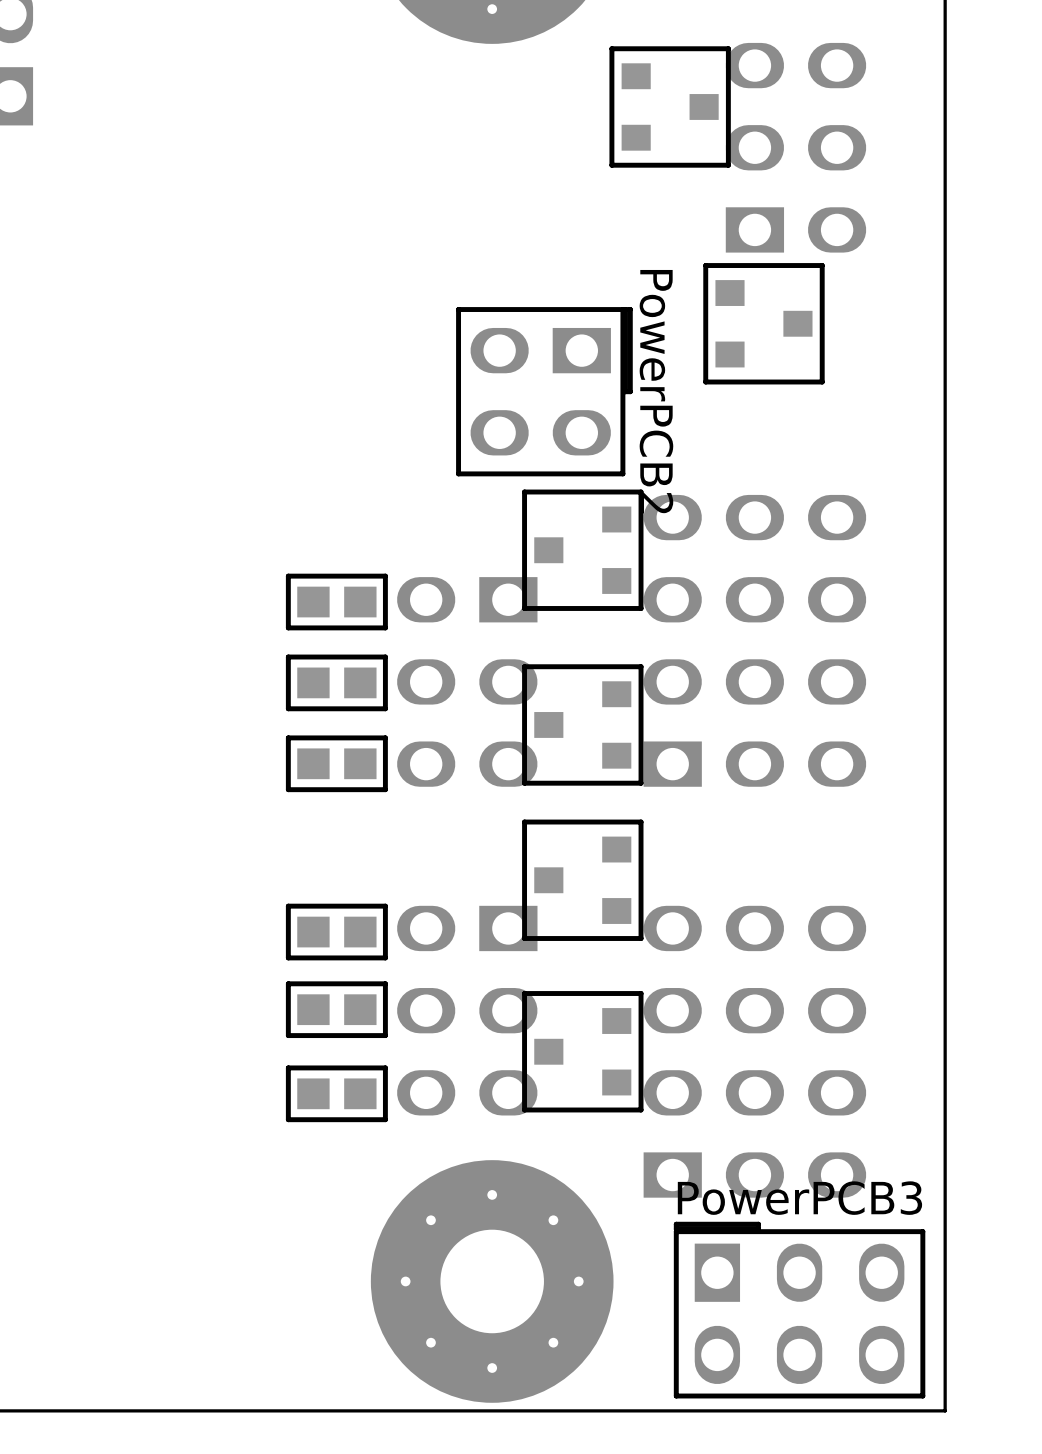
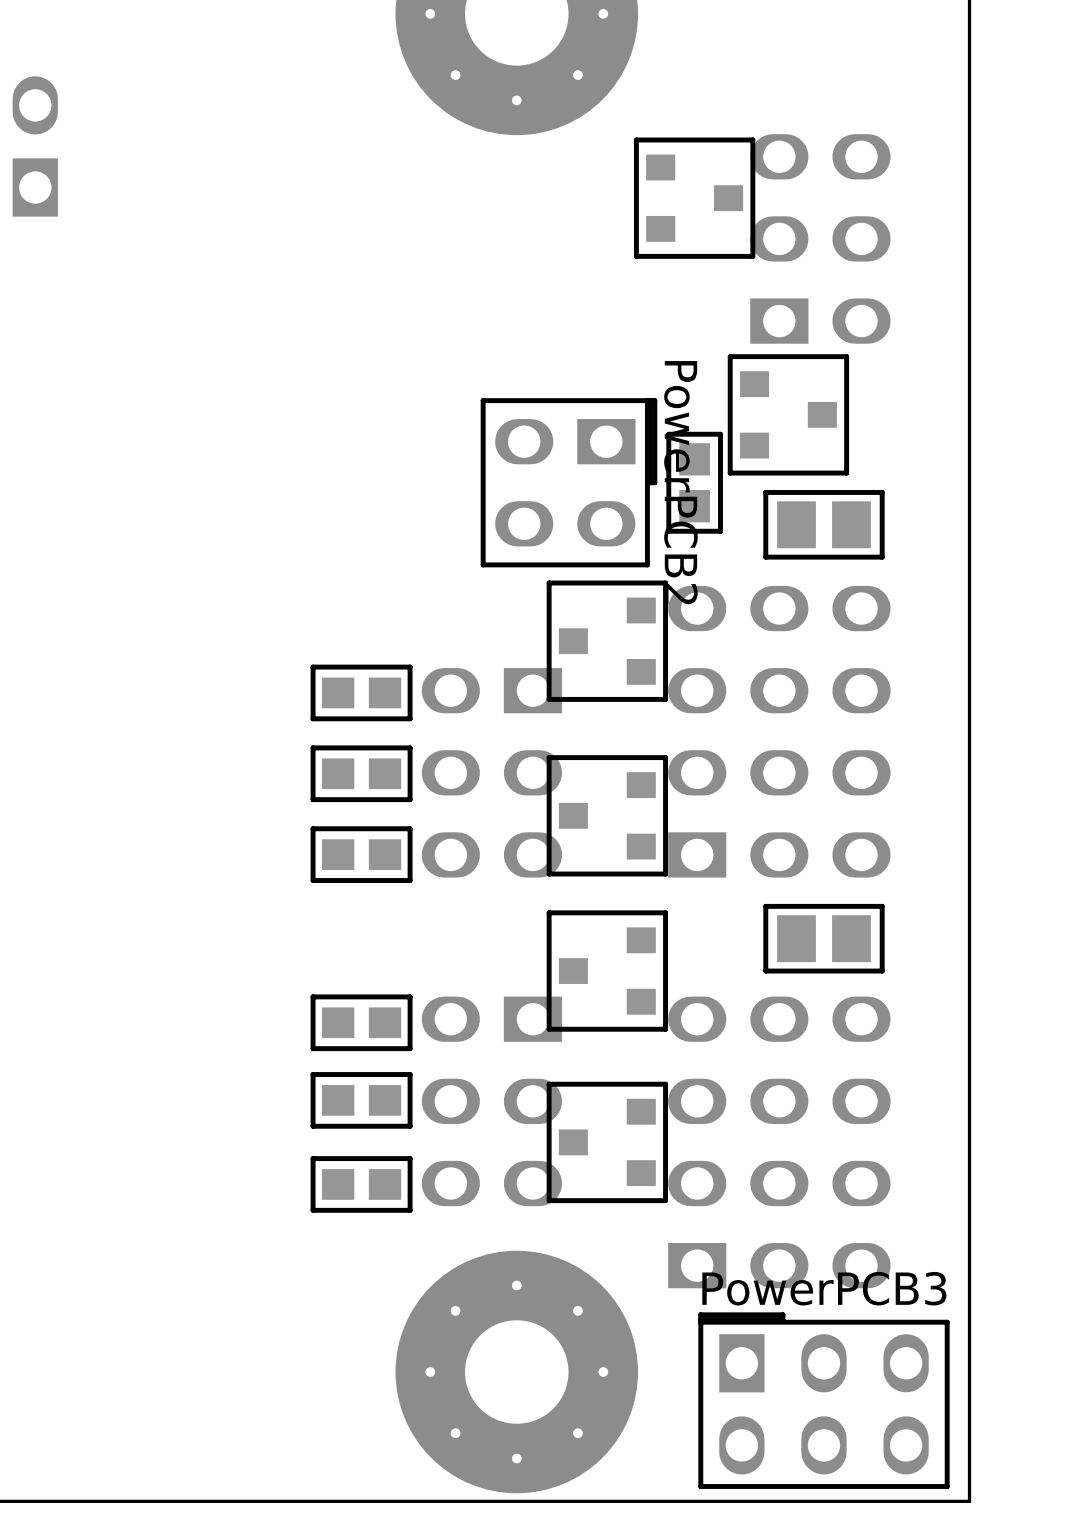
part: none -> (694, 482)
part: none -> (823, 524)
part: none -> (823, 938)

